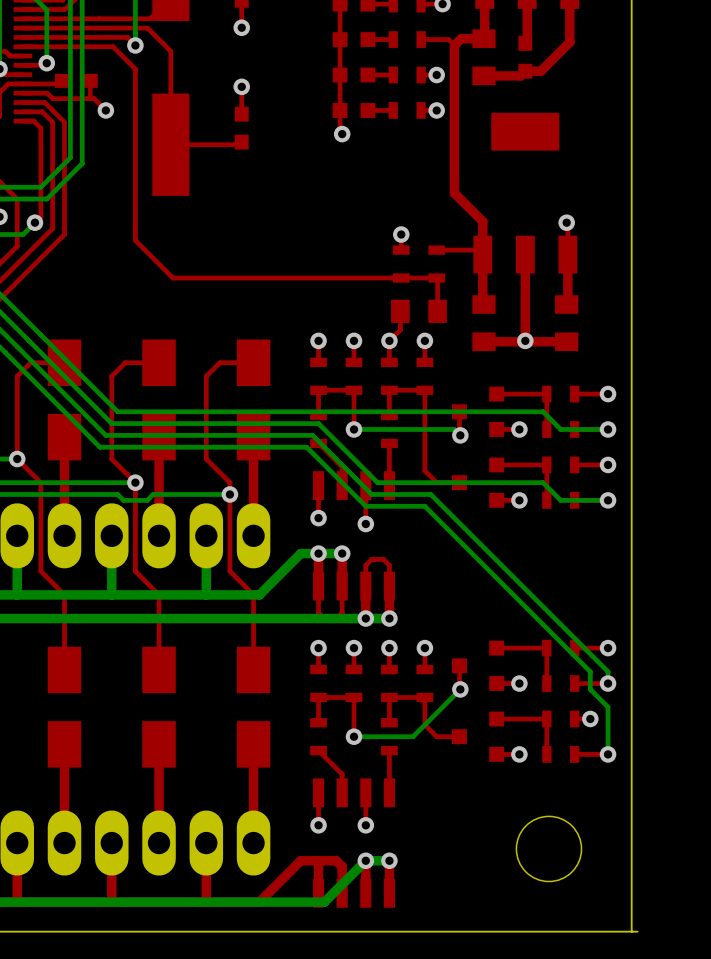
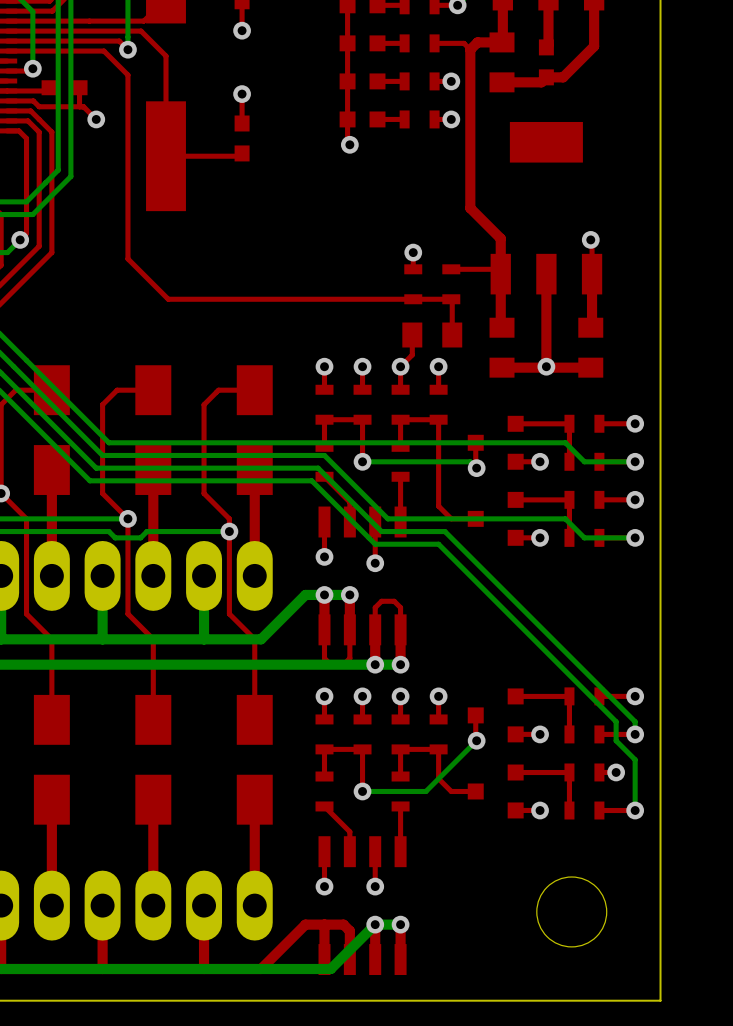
board edge: (637, 931) (631, 931) -> none

